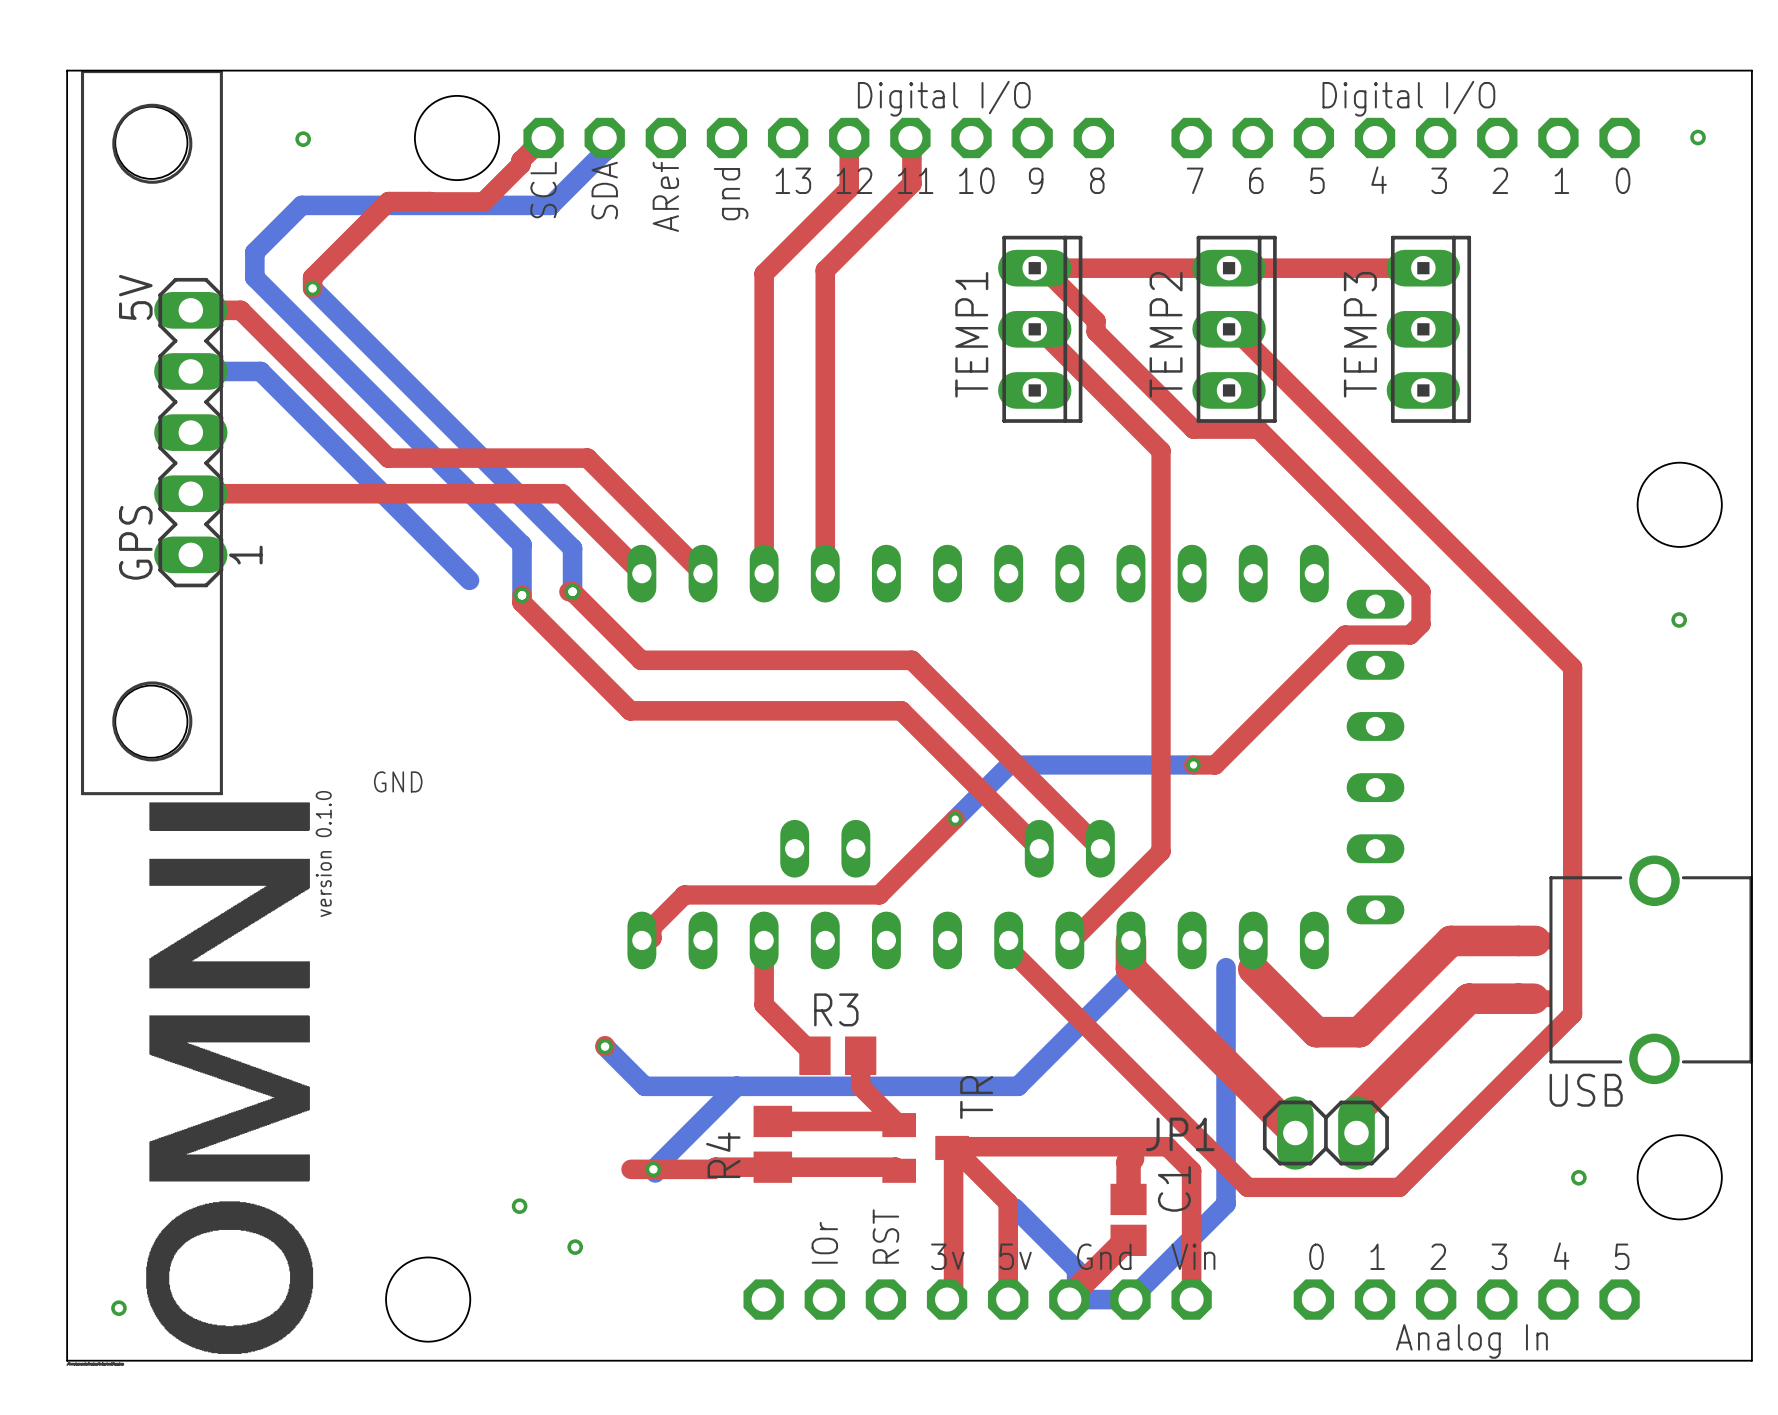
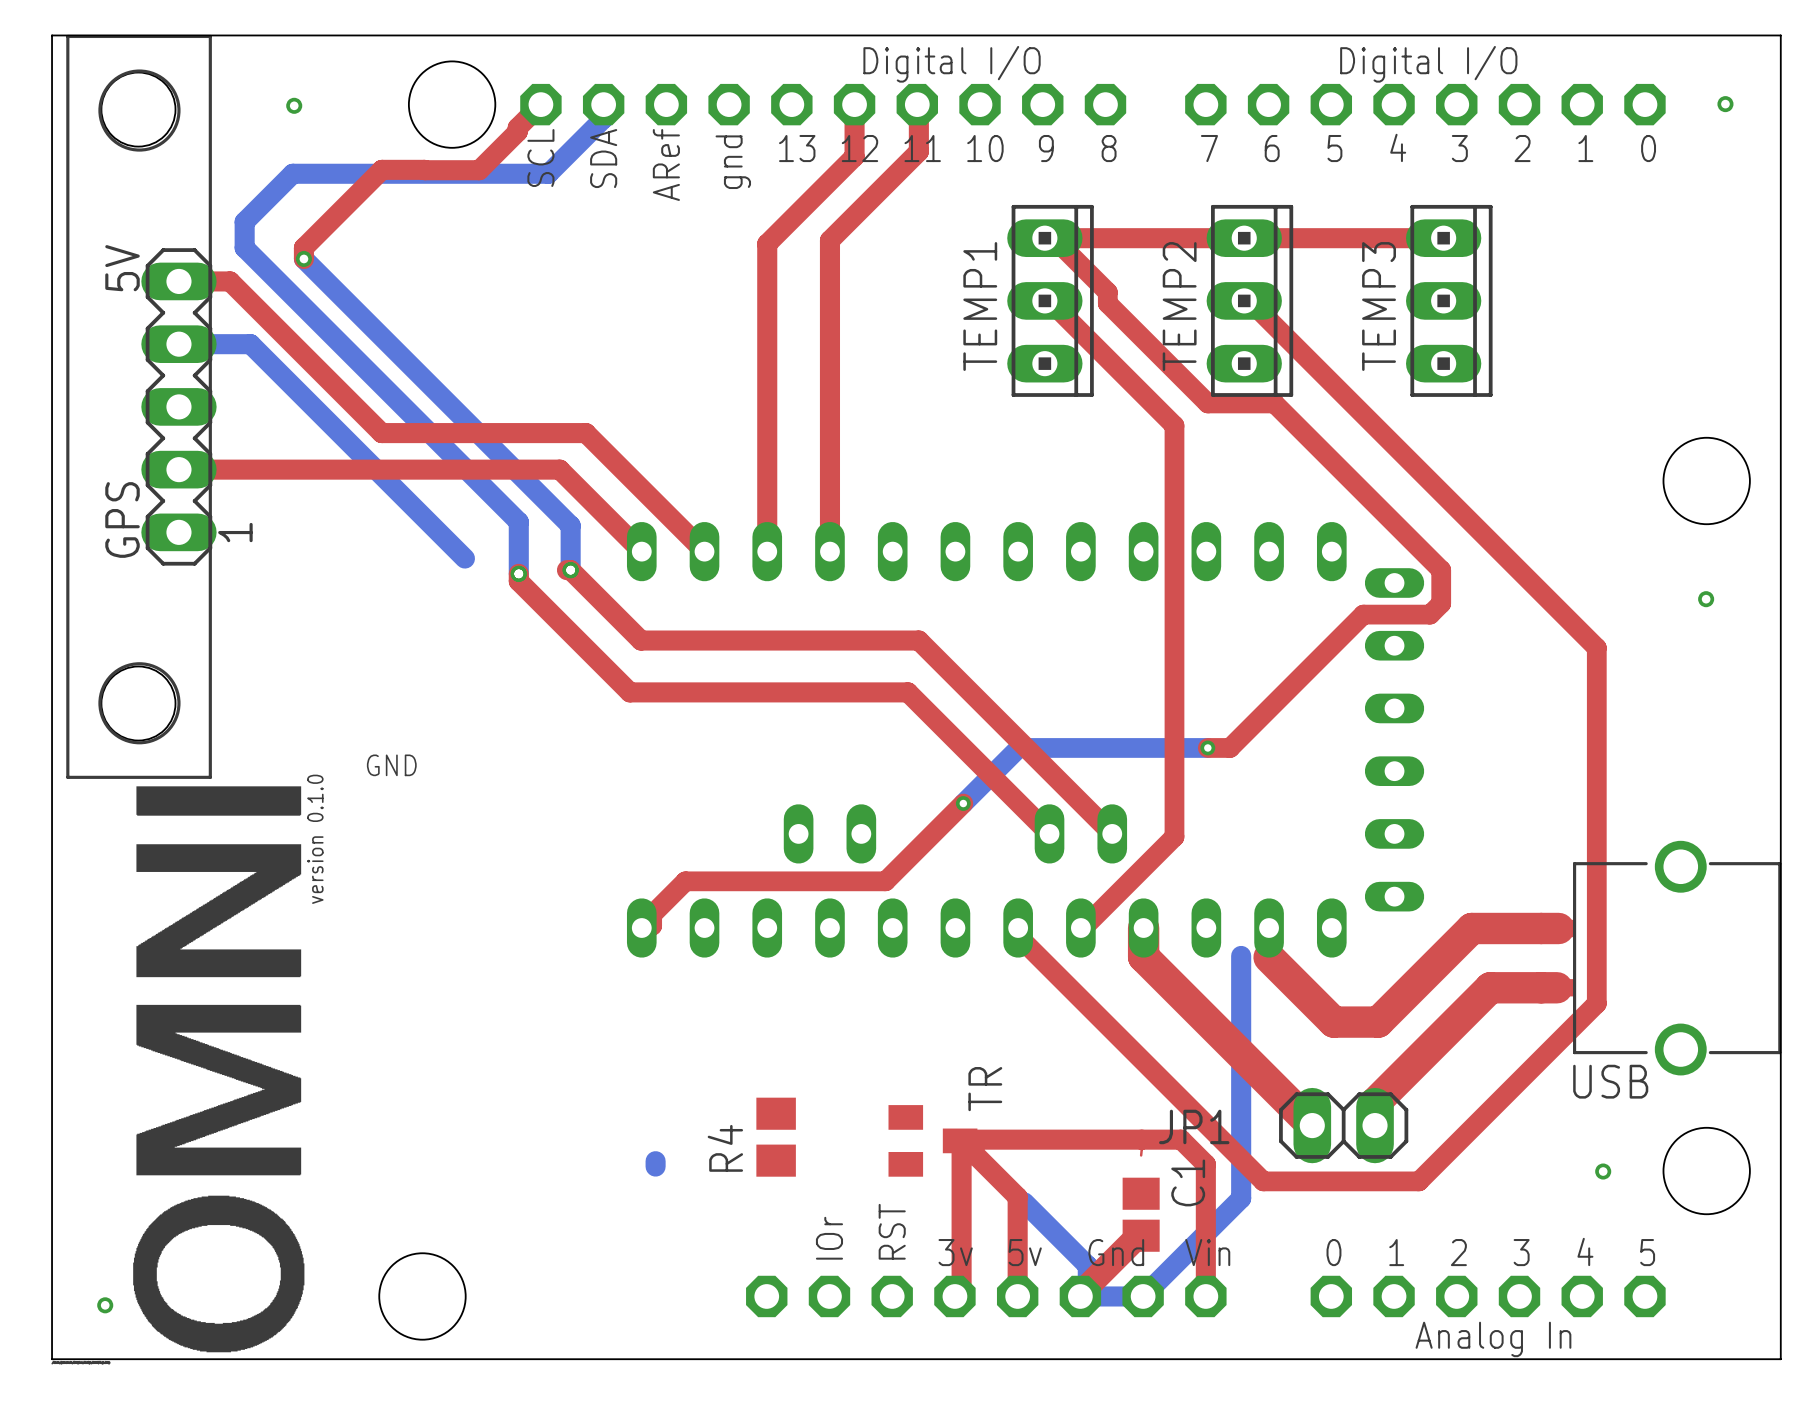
top track: (764, 940) (764, 1004) (814, 1055) -> none
bottom track: (1130, 940) (1130, 973) (1018, 1086) (644, 1086) (605, 1046) -> none
top track: (605, 1045) (605, 1046) -> none
via: (605, 1046) -> none
R3: (837, 1055) -> none
top track: (860, 1055) (860, 1086) (899, 1125) -> none
bottom track: (736, 1086) (653, 1169) -> none
top track: (772, 1121) (895, 1121) -> none
top track: (1132, 1158) (1128, 1162) (1128, 1199) -> none
top track: (631, 1169) (895, 1167) (899, 1170) -> none
via: (653, 1169) -> none
via: (519, 1206) -> none
via: (575, 1247) -> none

